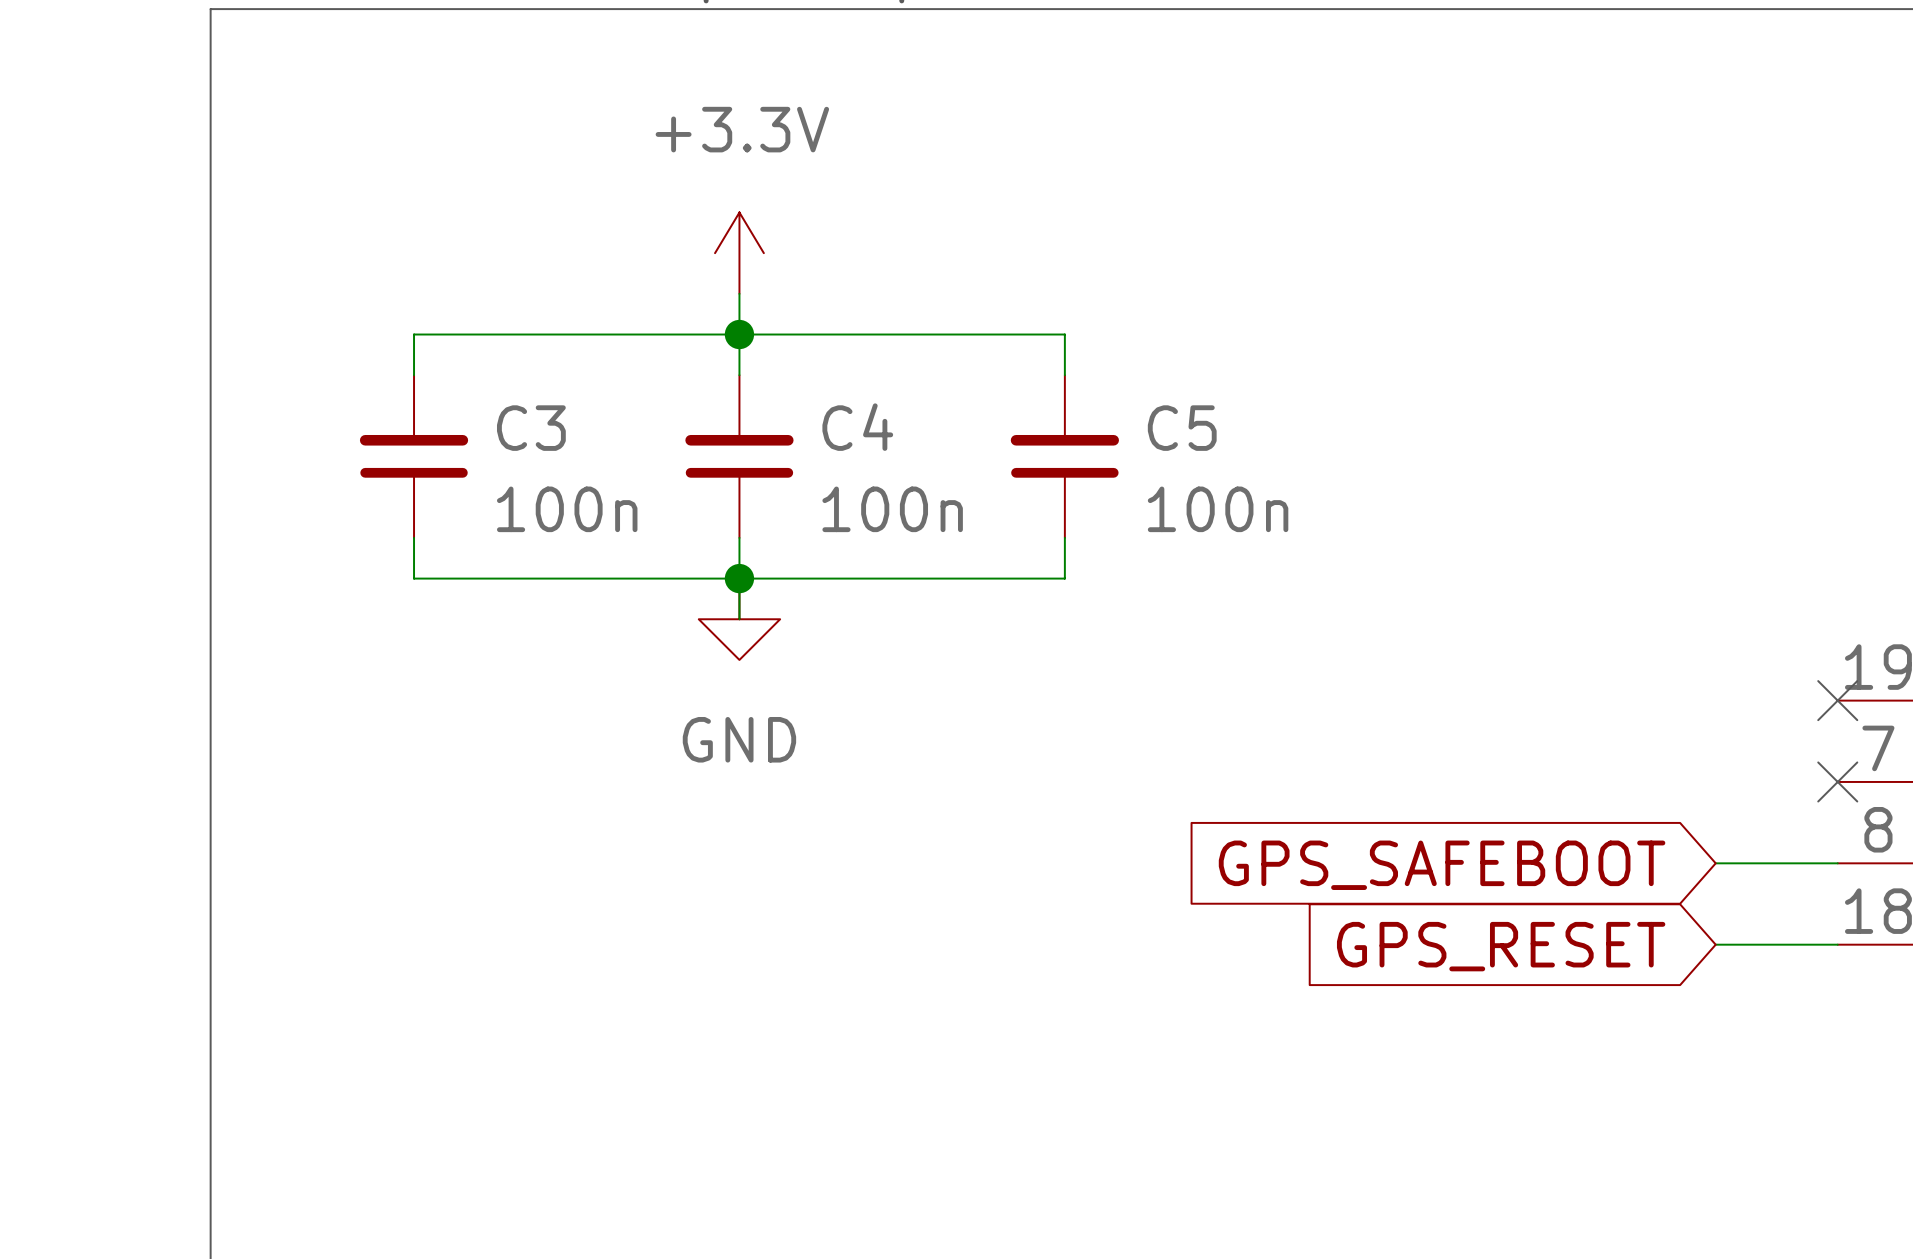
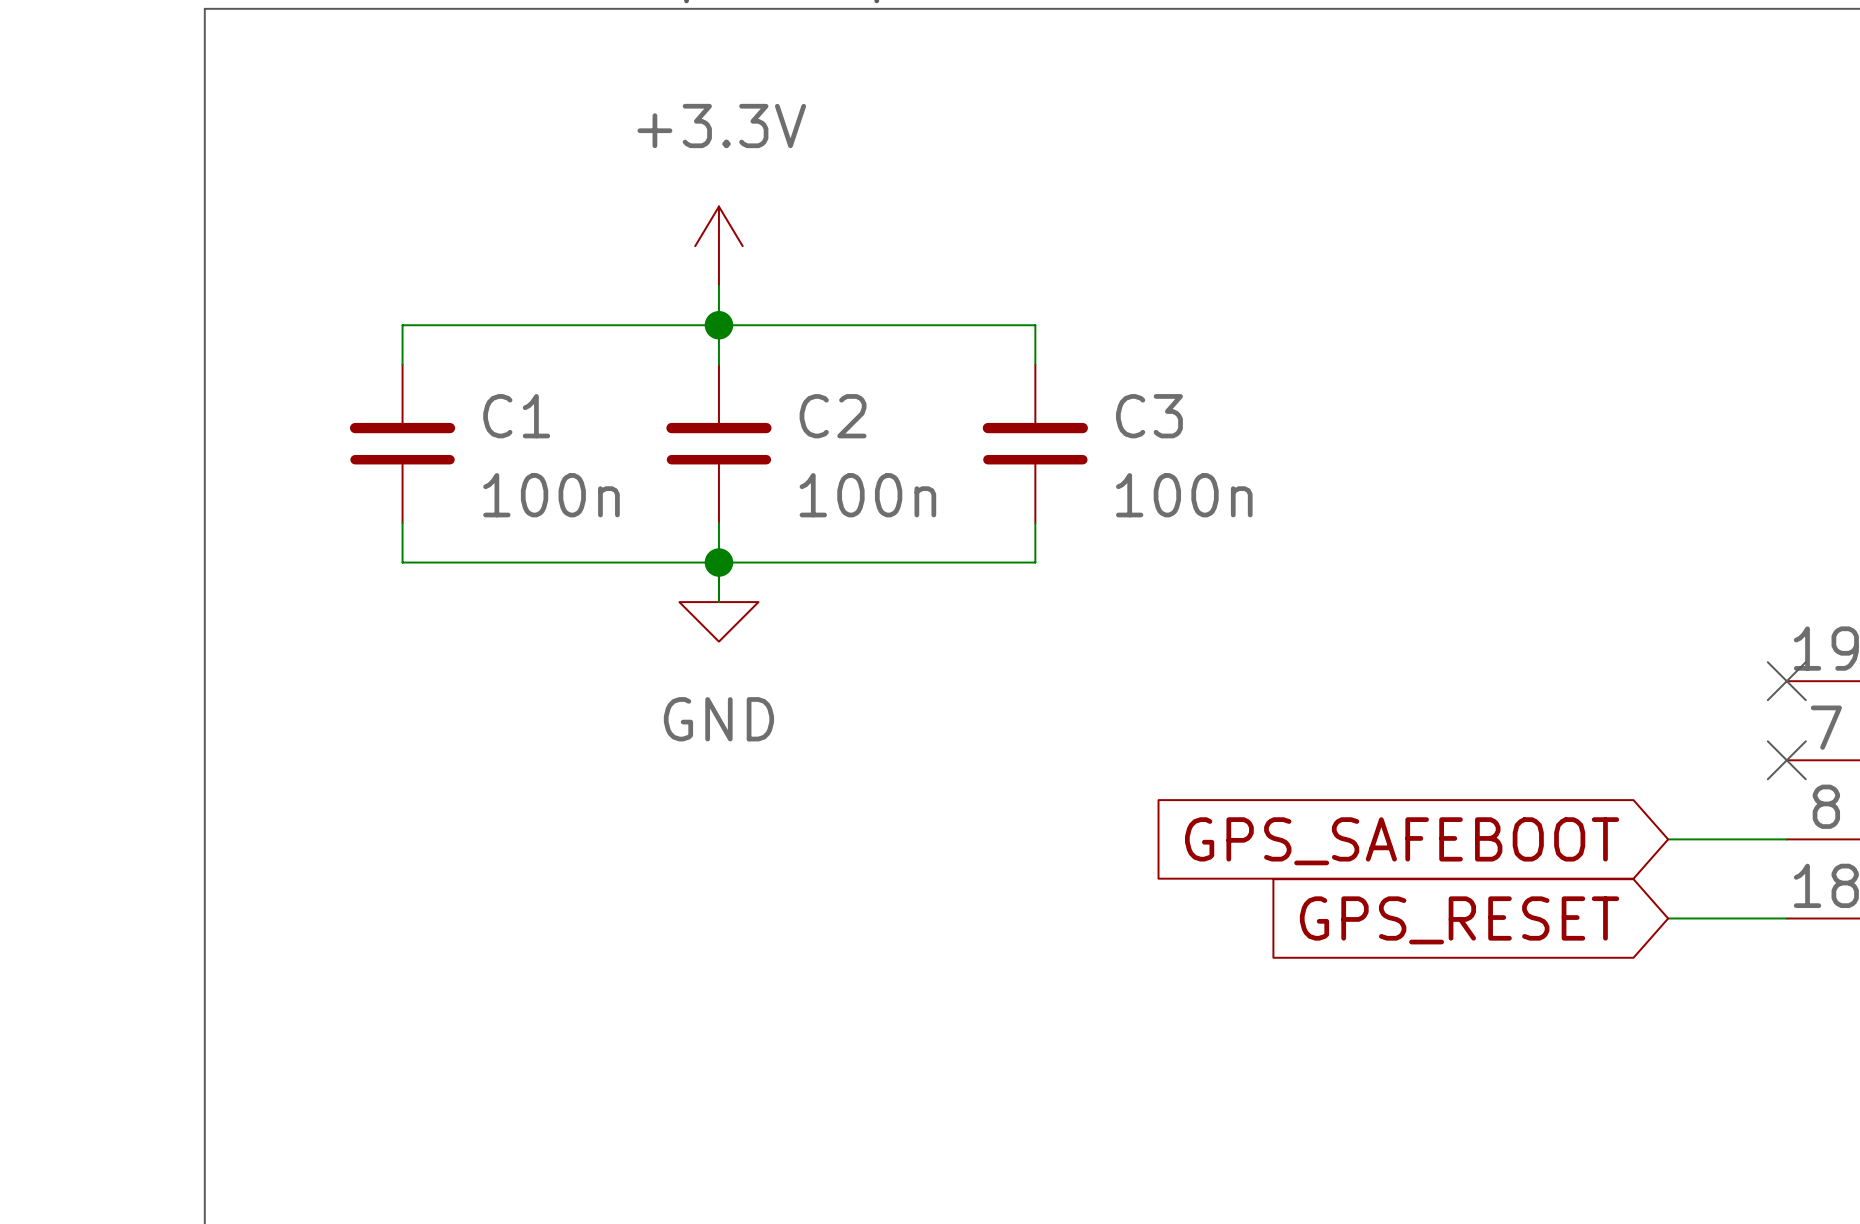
C4 name: C4 (857, 427) -> C2 (833, 416)
C3 name: C3 (531, 428) -> C1 (516, 416)
C5 name: C5 (1182, 428) -> C3 (1149, 416)

